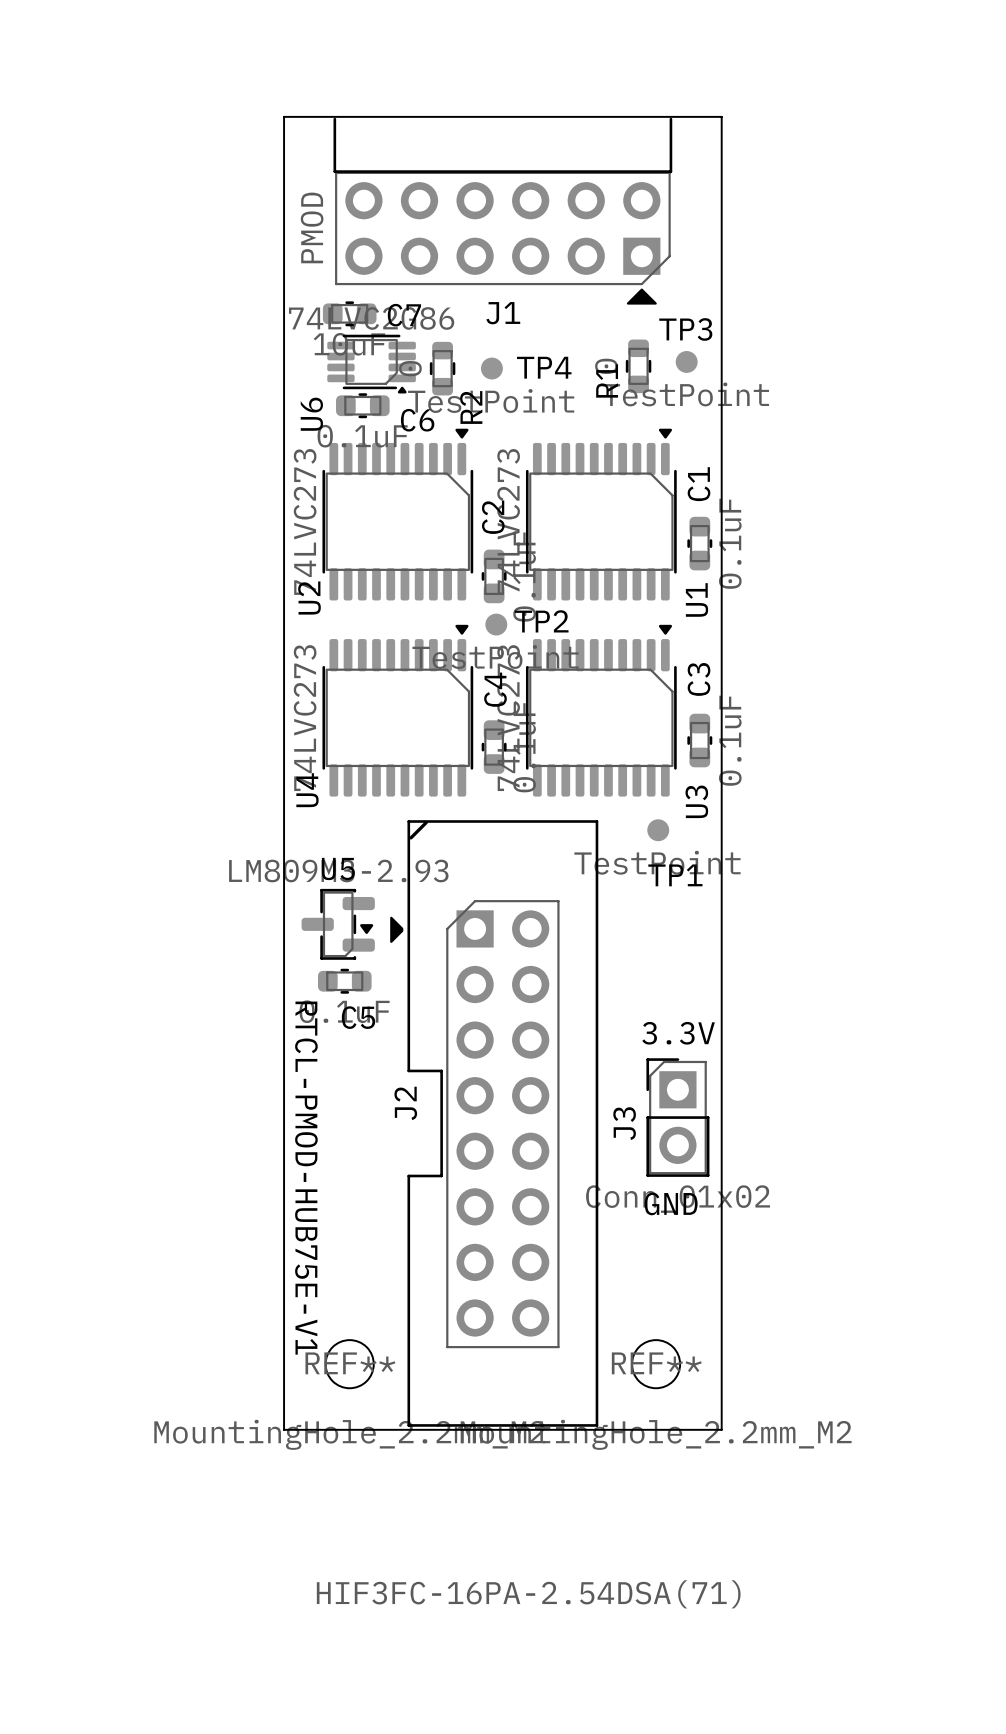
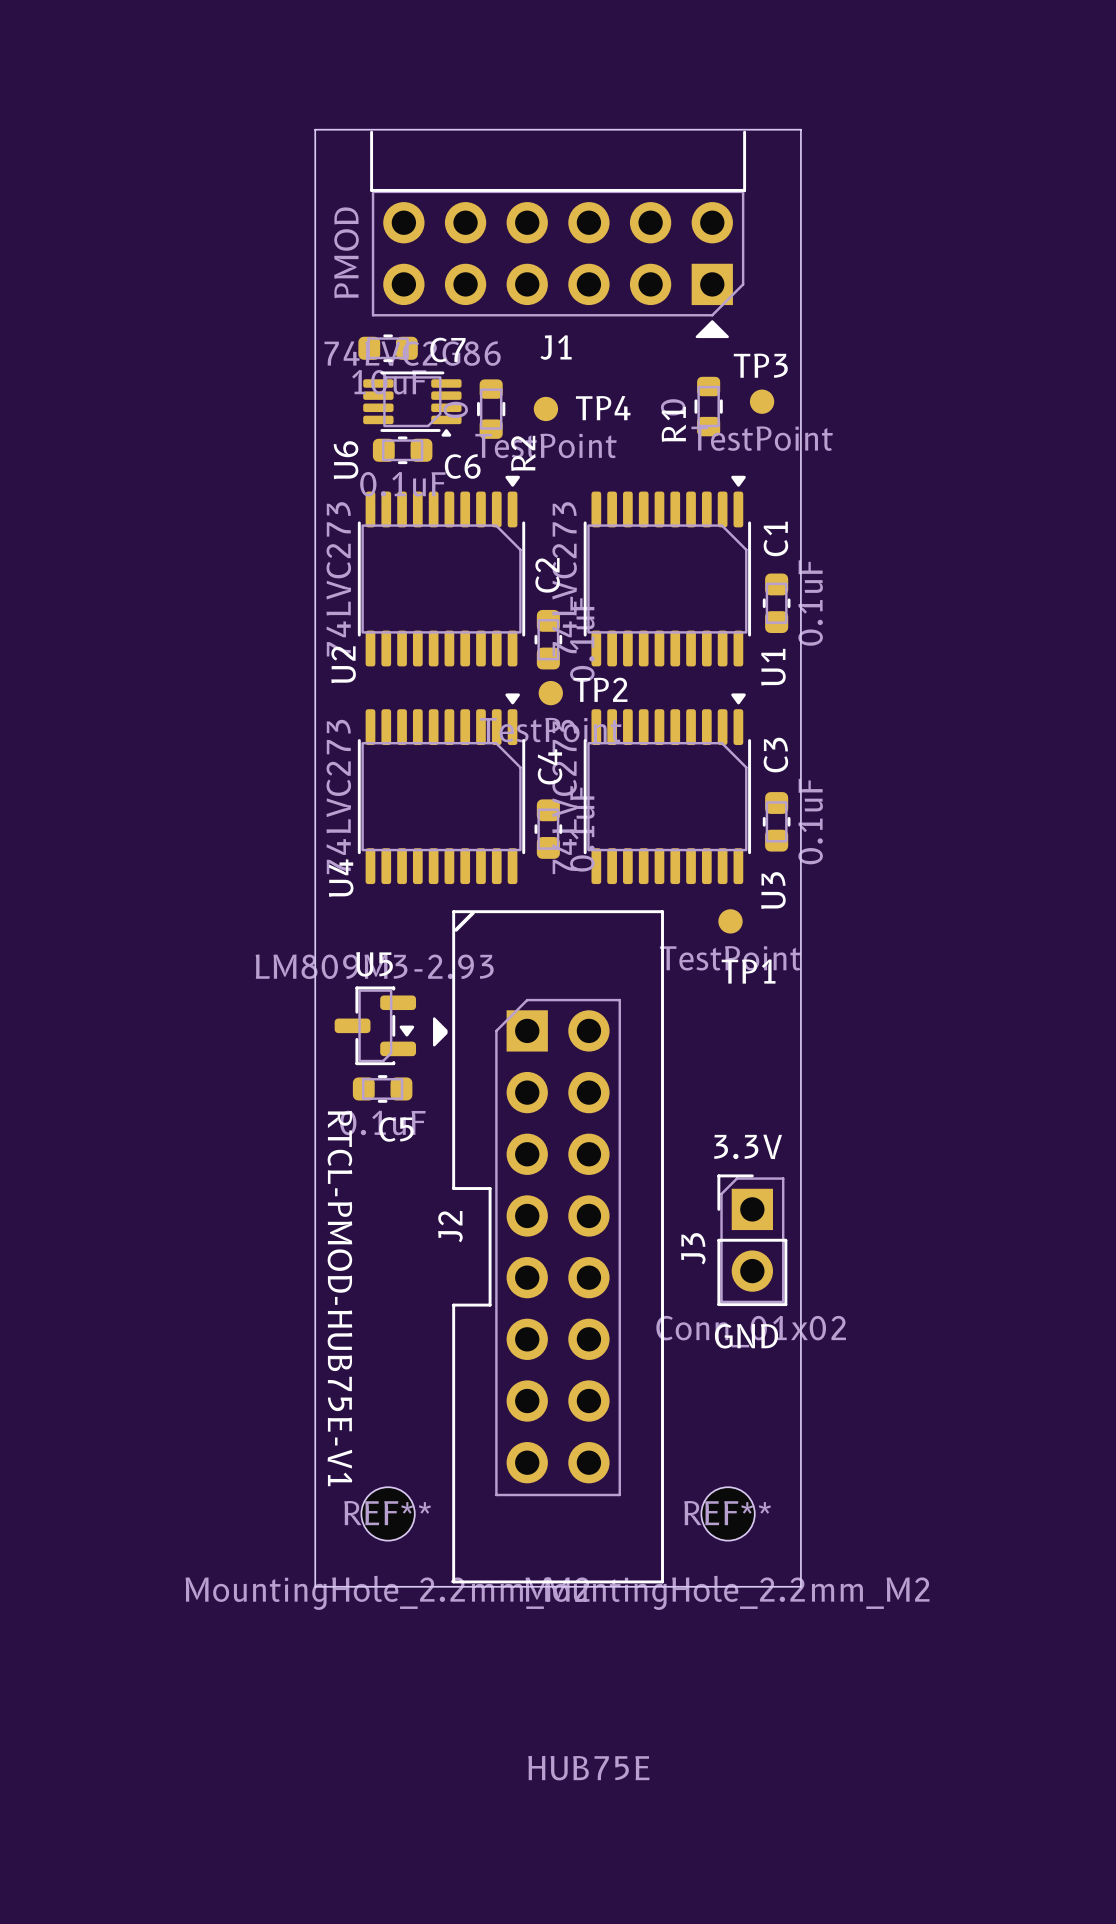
J2 value: HIF3FC-16PA-2.54DSA(71) (528, 1594) -> HUB75E (588, 1768)

